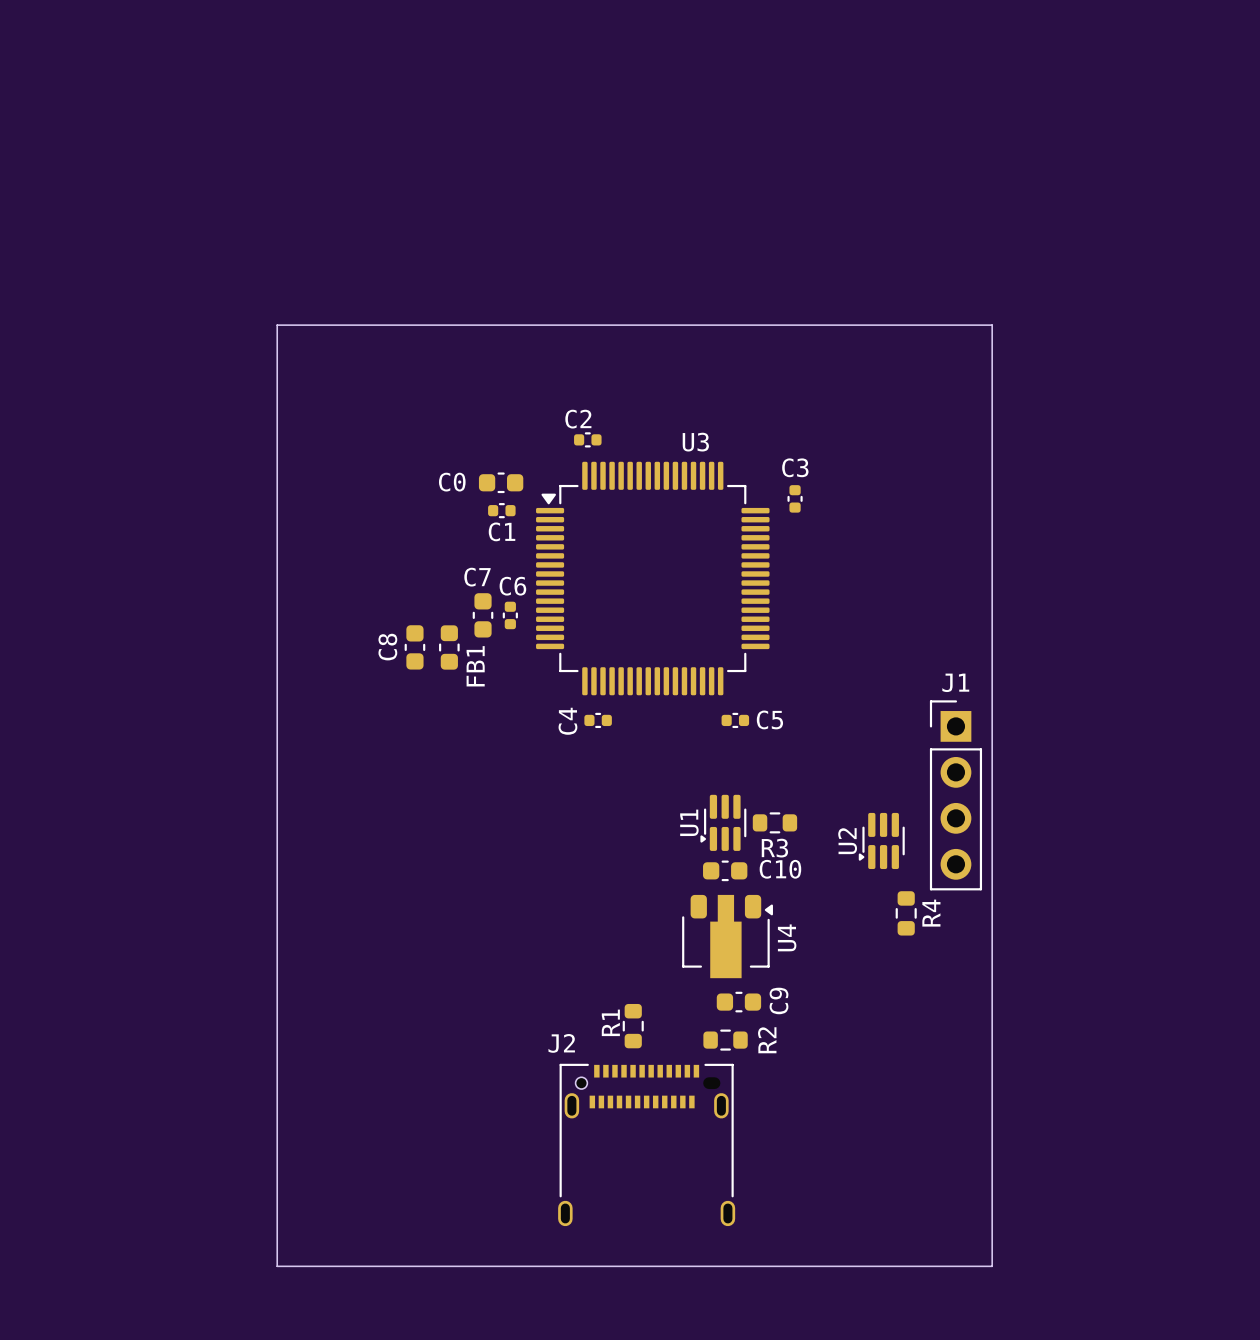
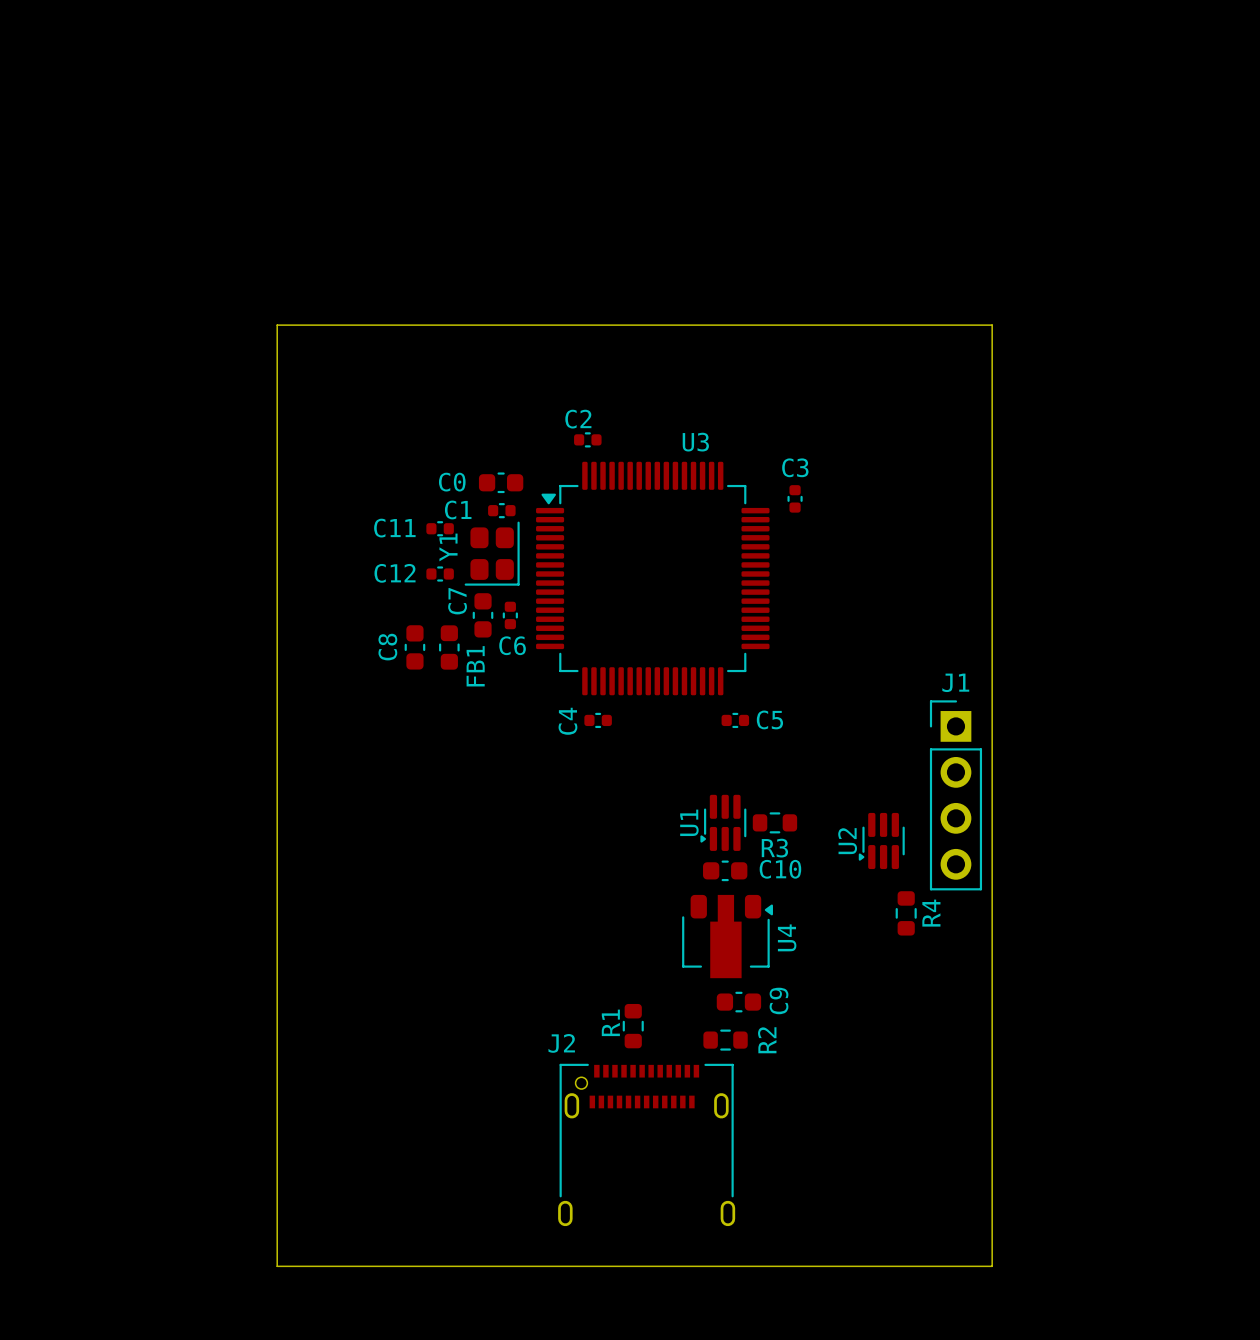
C11: none -> (440, 528)
C1 name position: C1 (502, 531) -> C1 (458, 509)
Y1: none -> (492, 553)
C12: none -> (440, 574)
C7 name rotation: 0° (477, 577) -> 90° counterclockwise (457, 601)
C6 name position: C6 (512, 586) -> C6 (512, 645)

